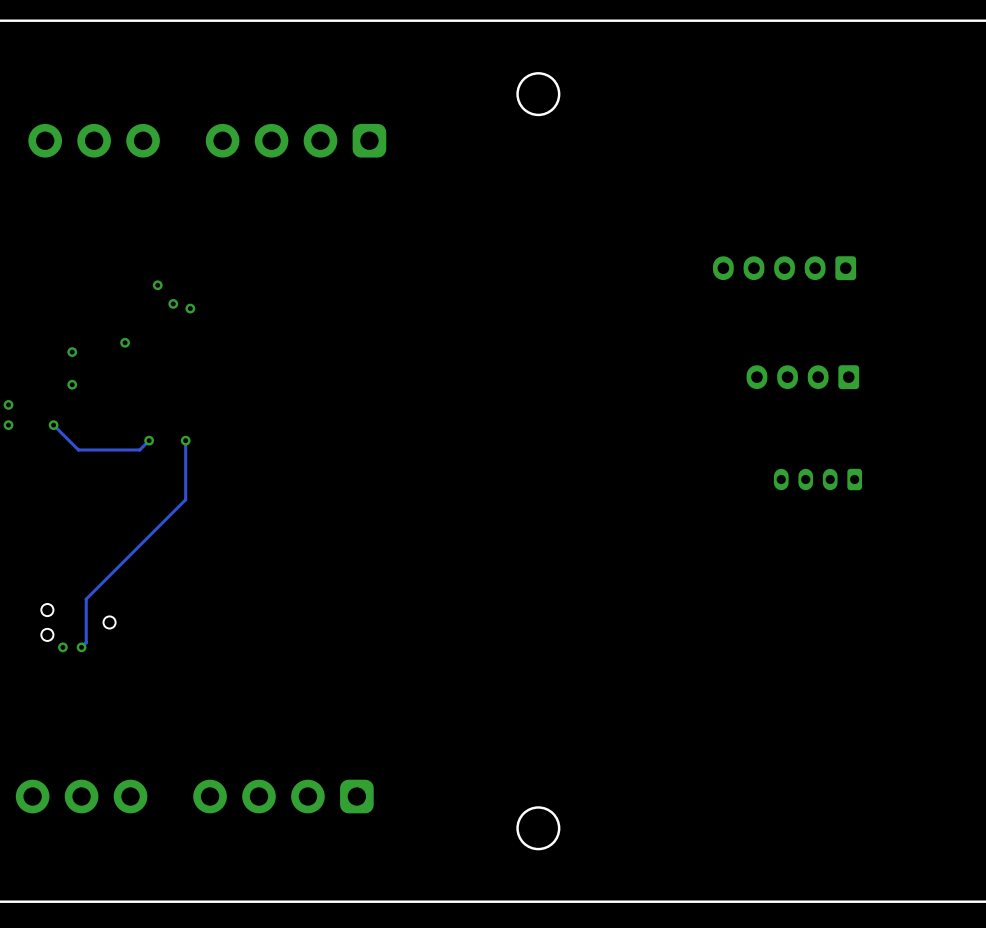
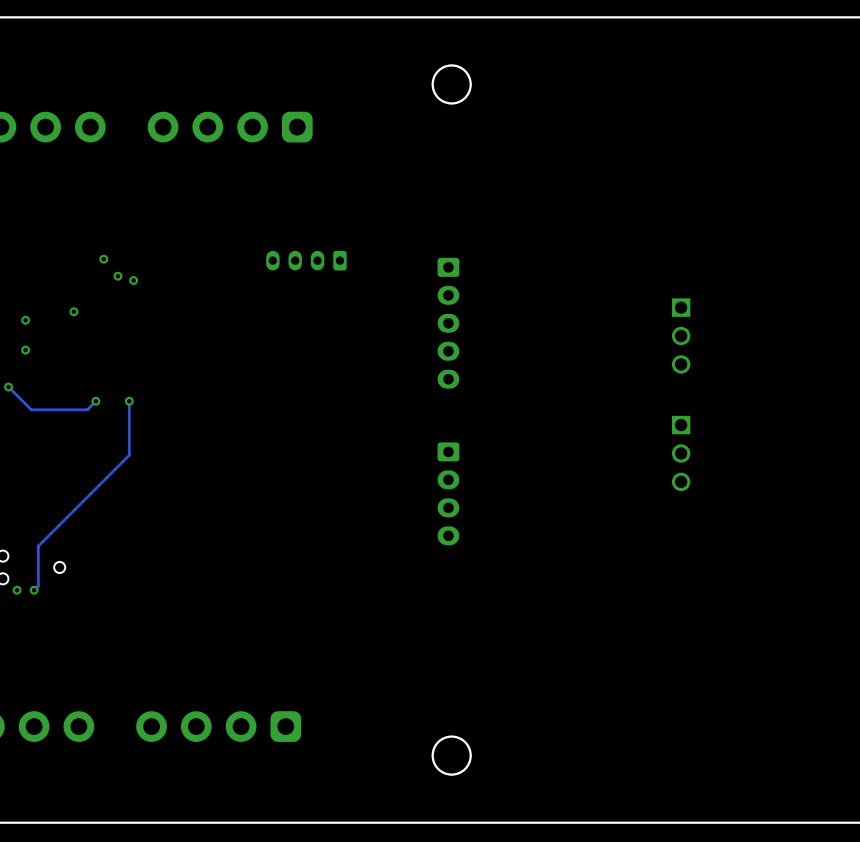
part rotation: 0° (784, 268) -> 90° counterclockwise (448, 323)
part position: (784, 268) -> (448, 323)
part: none -> (306, 260)
part: none -> (681, 336)
part: (802, 377) -> none
part: (817, 479) -> none
part: none -> (681, 453)
part: none -> (448, 493)

